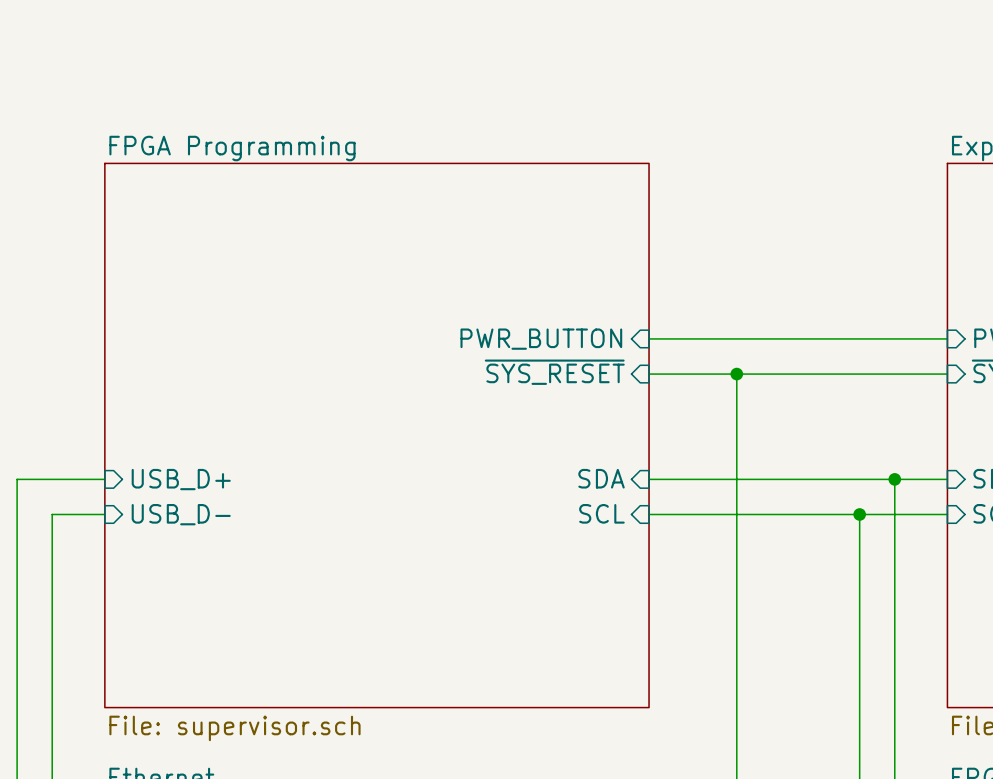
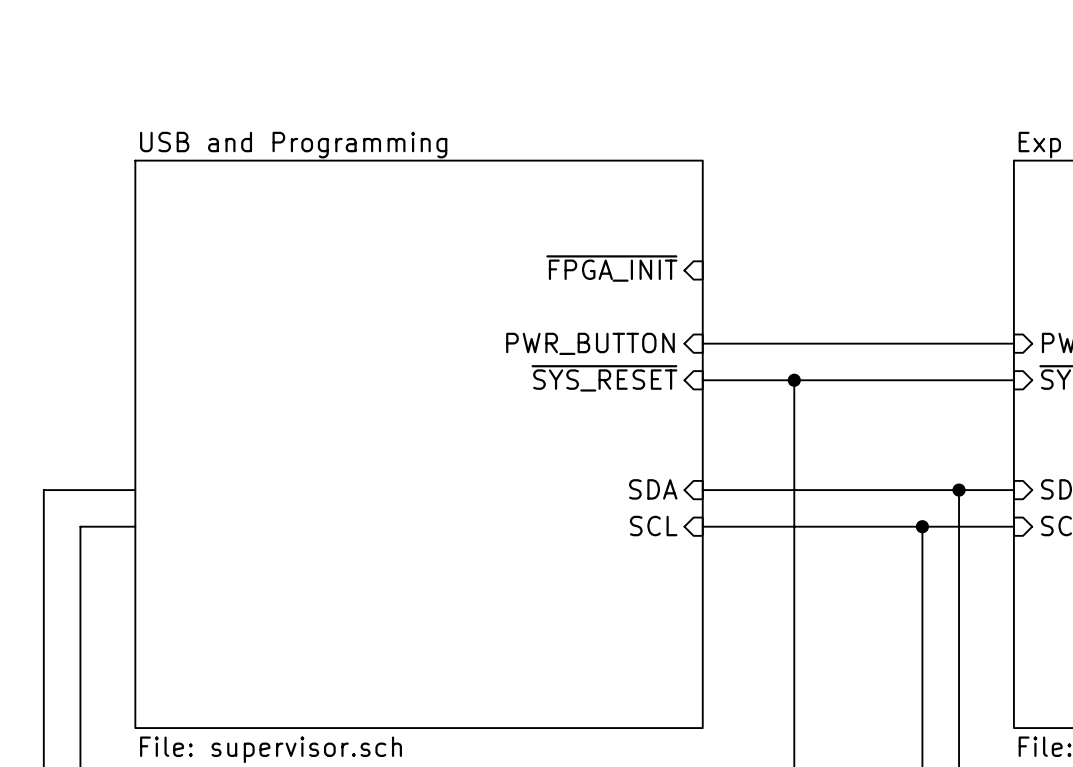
sheet FPGA Programming name: FPGA Programming (232, 148) -> USB and Programming (293, 145)
sheet pin: none -> ~{FPGA_INIT} (611, 268)
sheet pin: USB_D+ (181, 479) -> none
sheet pin: USB_D- (181, 514) -> none

